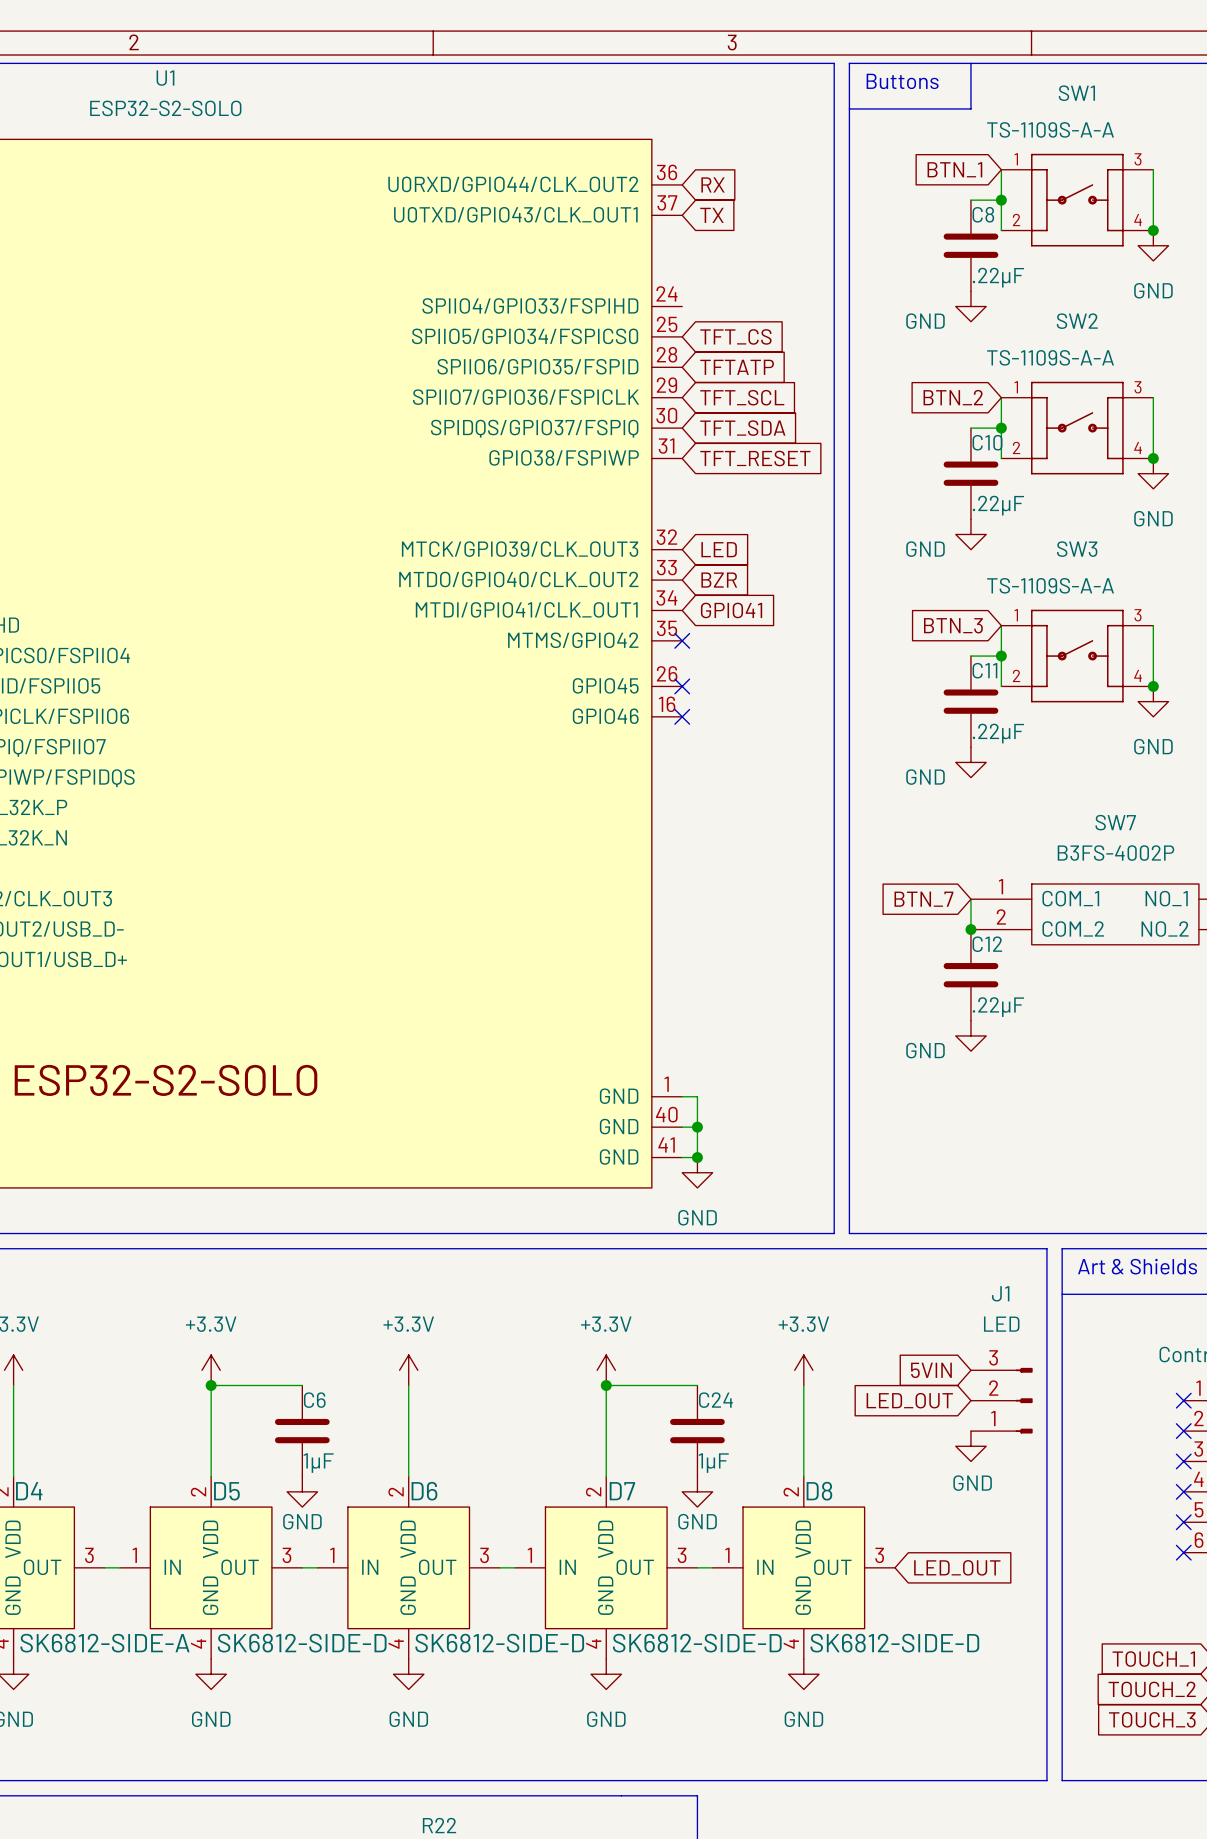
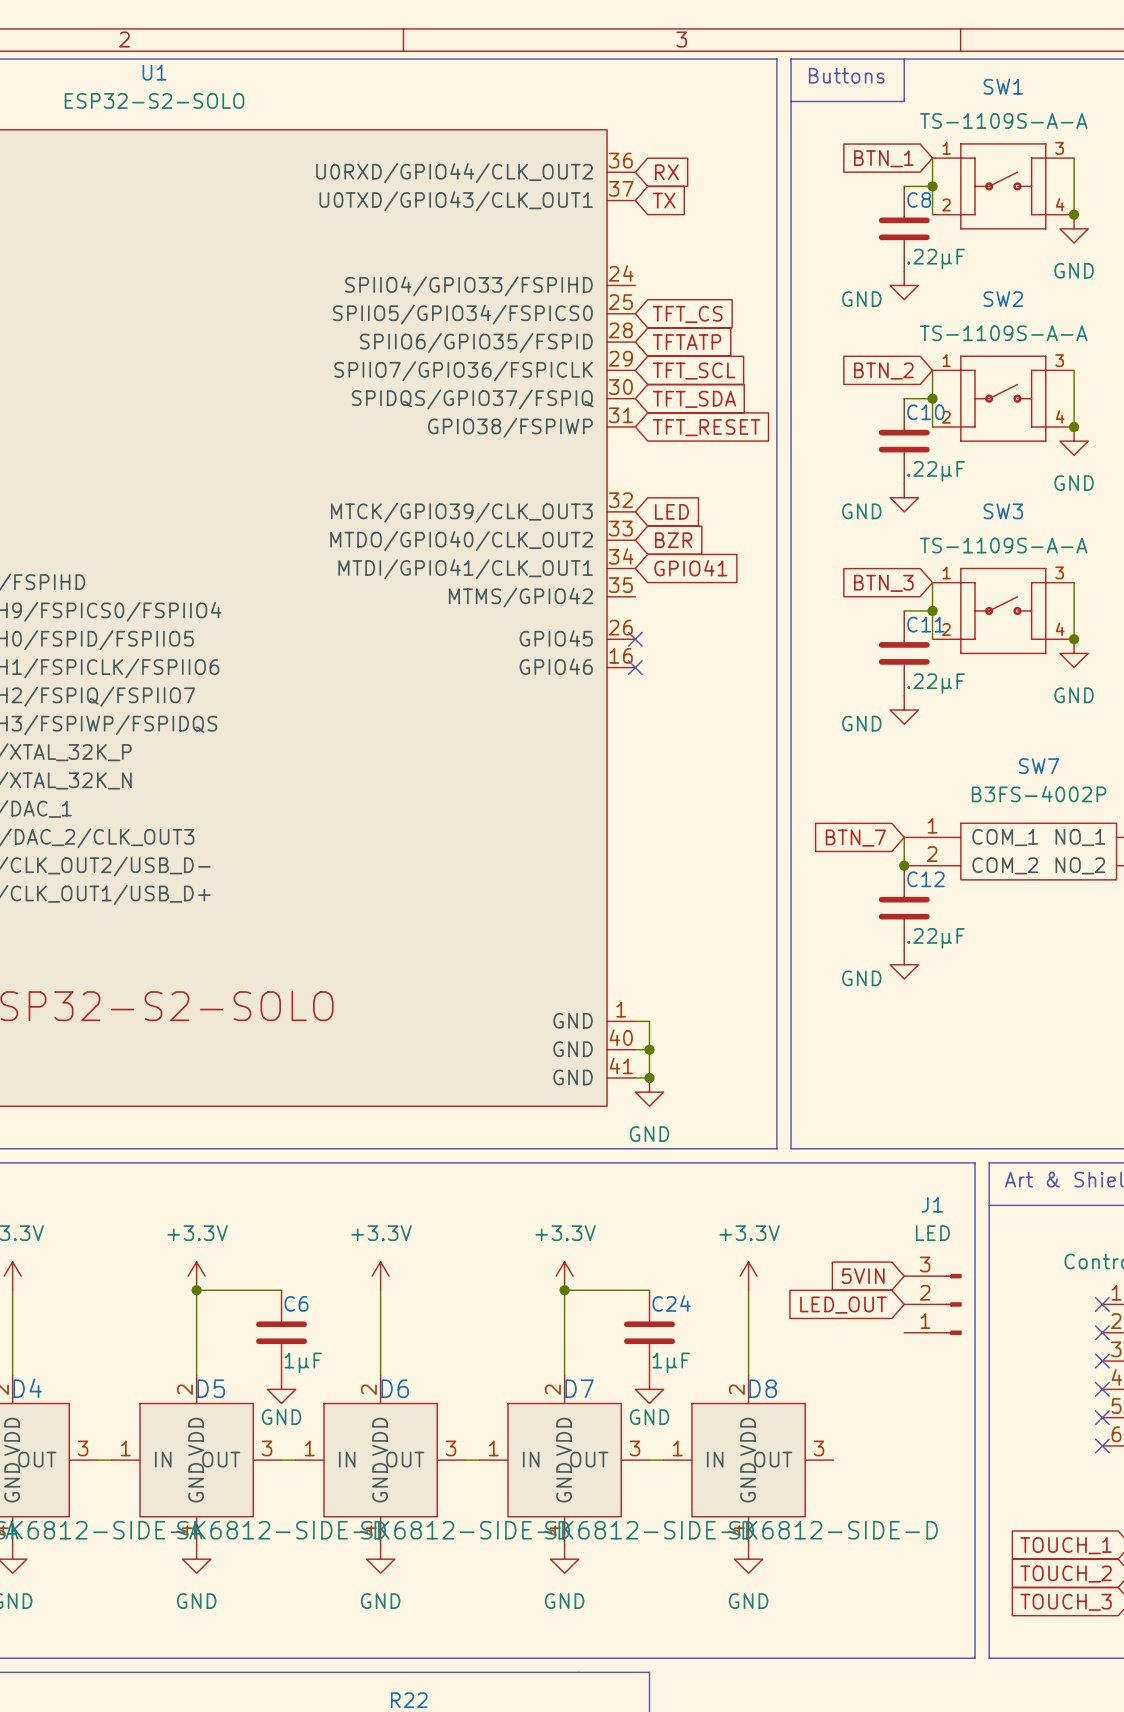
no-connect mark: (682, 640) -> none
power symbol: GND (970, 1446) -> none
global label: LED_OUT (957, 1567) -> none

